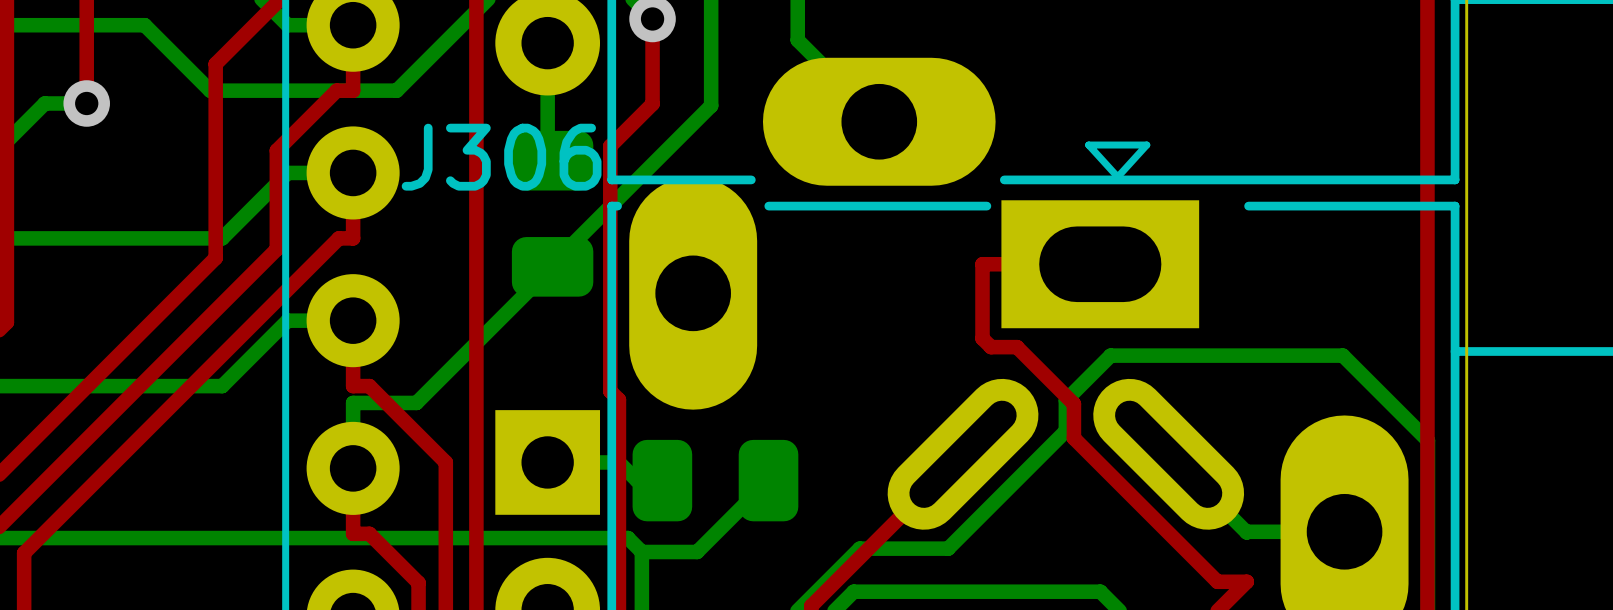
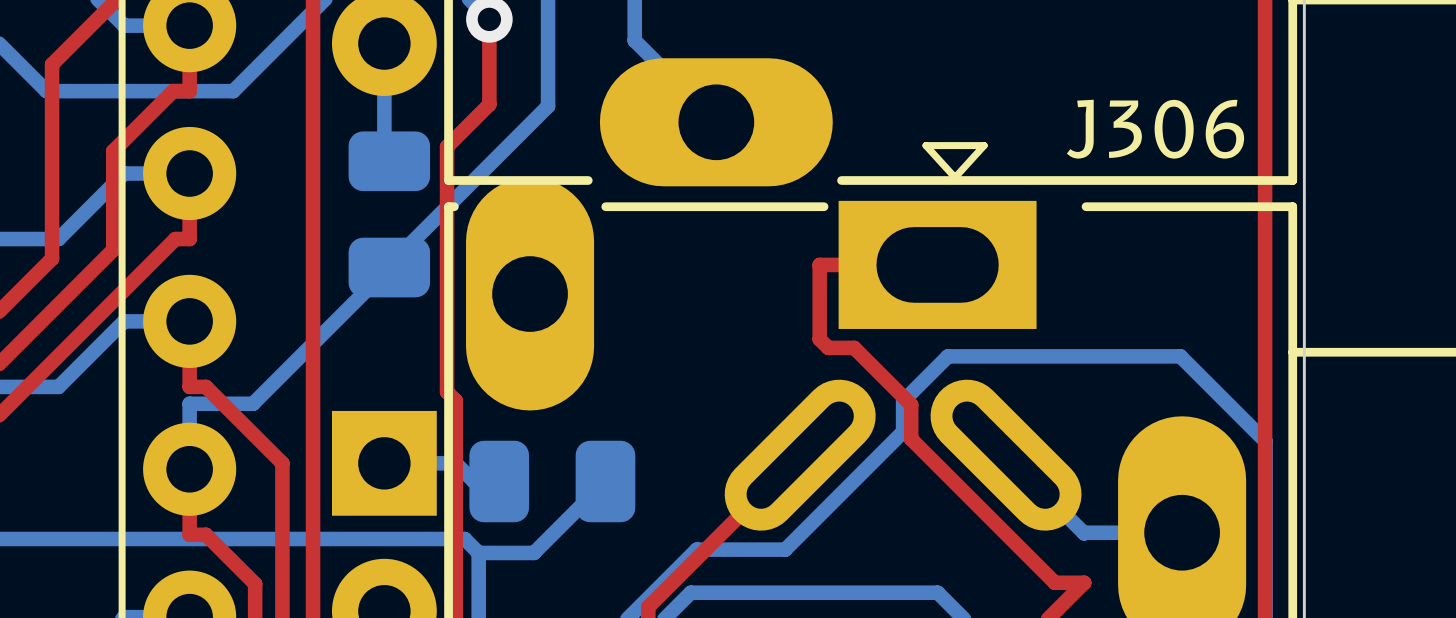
J306 name position: J306 (501, 157) -> J306 (1155, 129)

